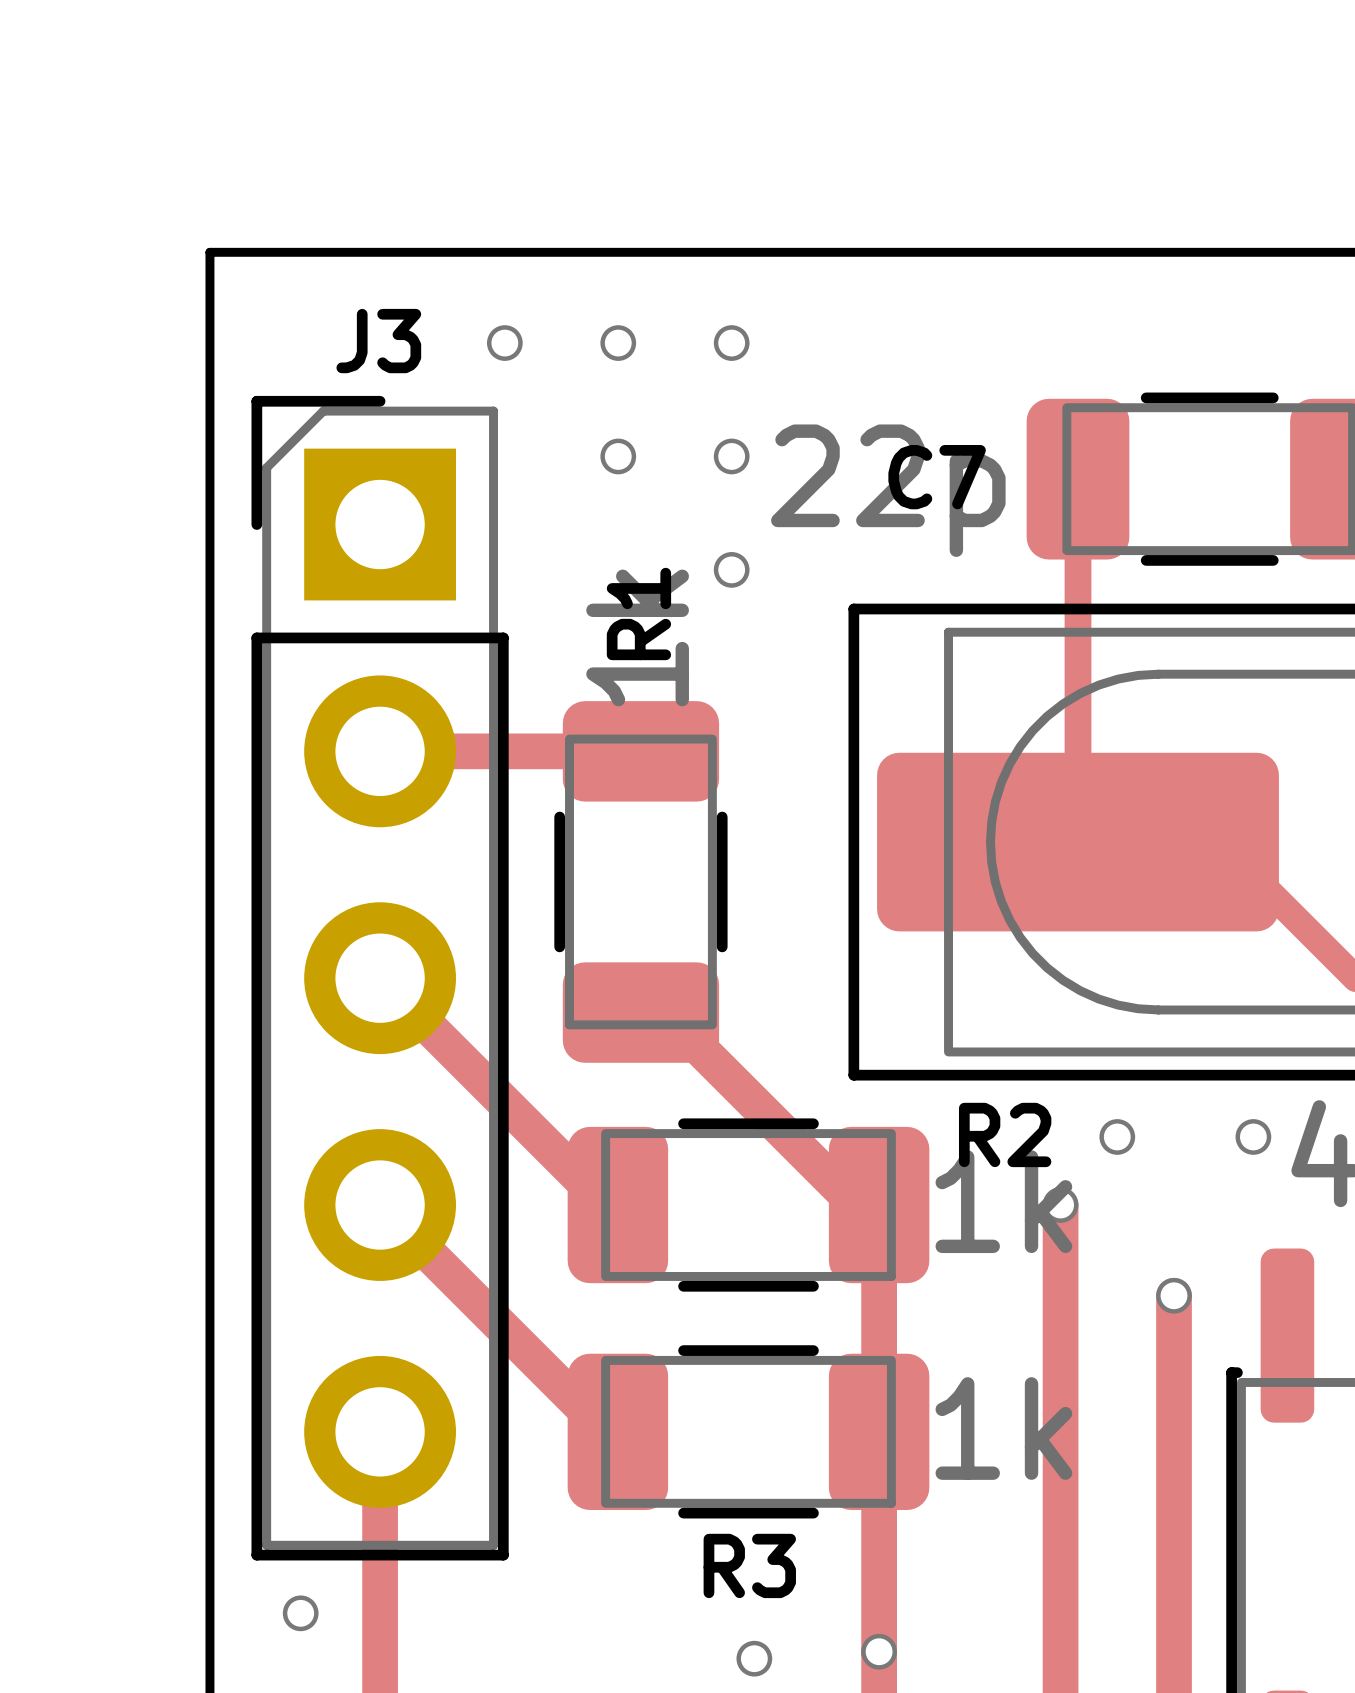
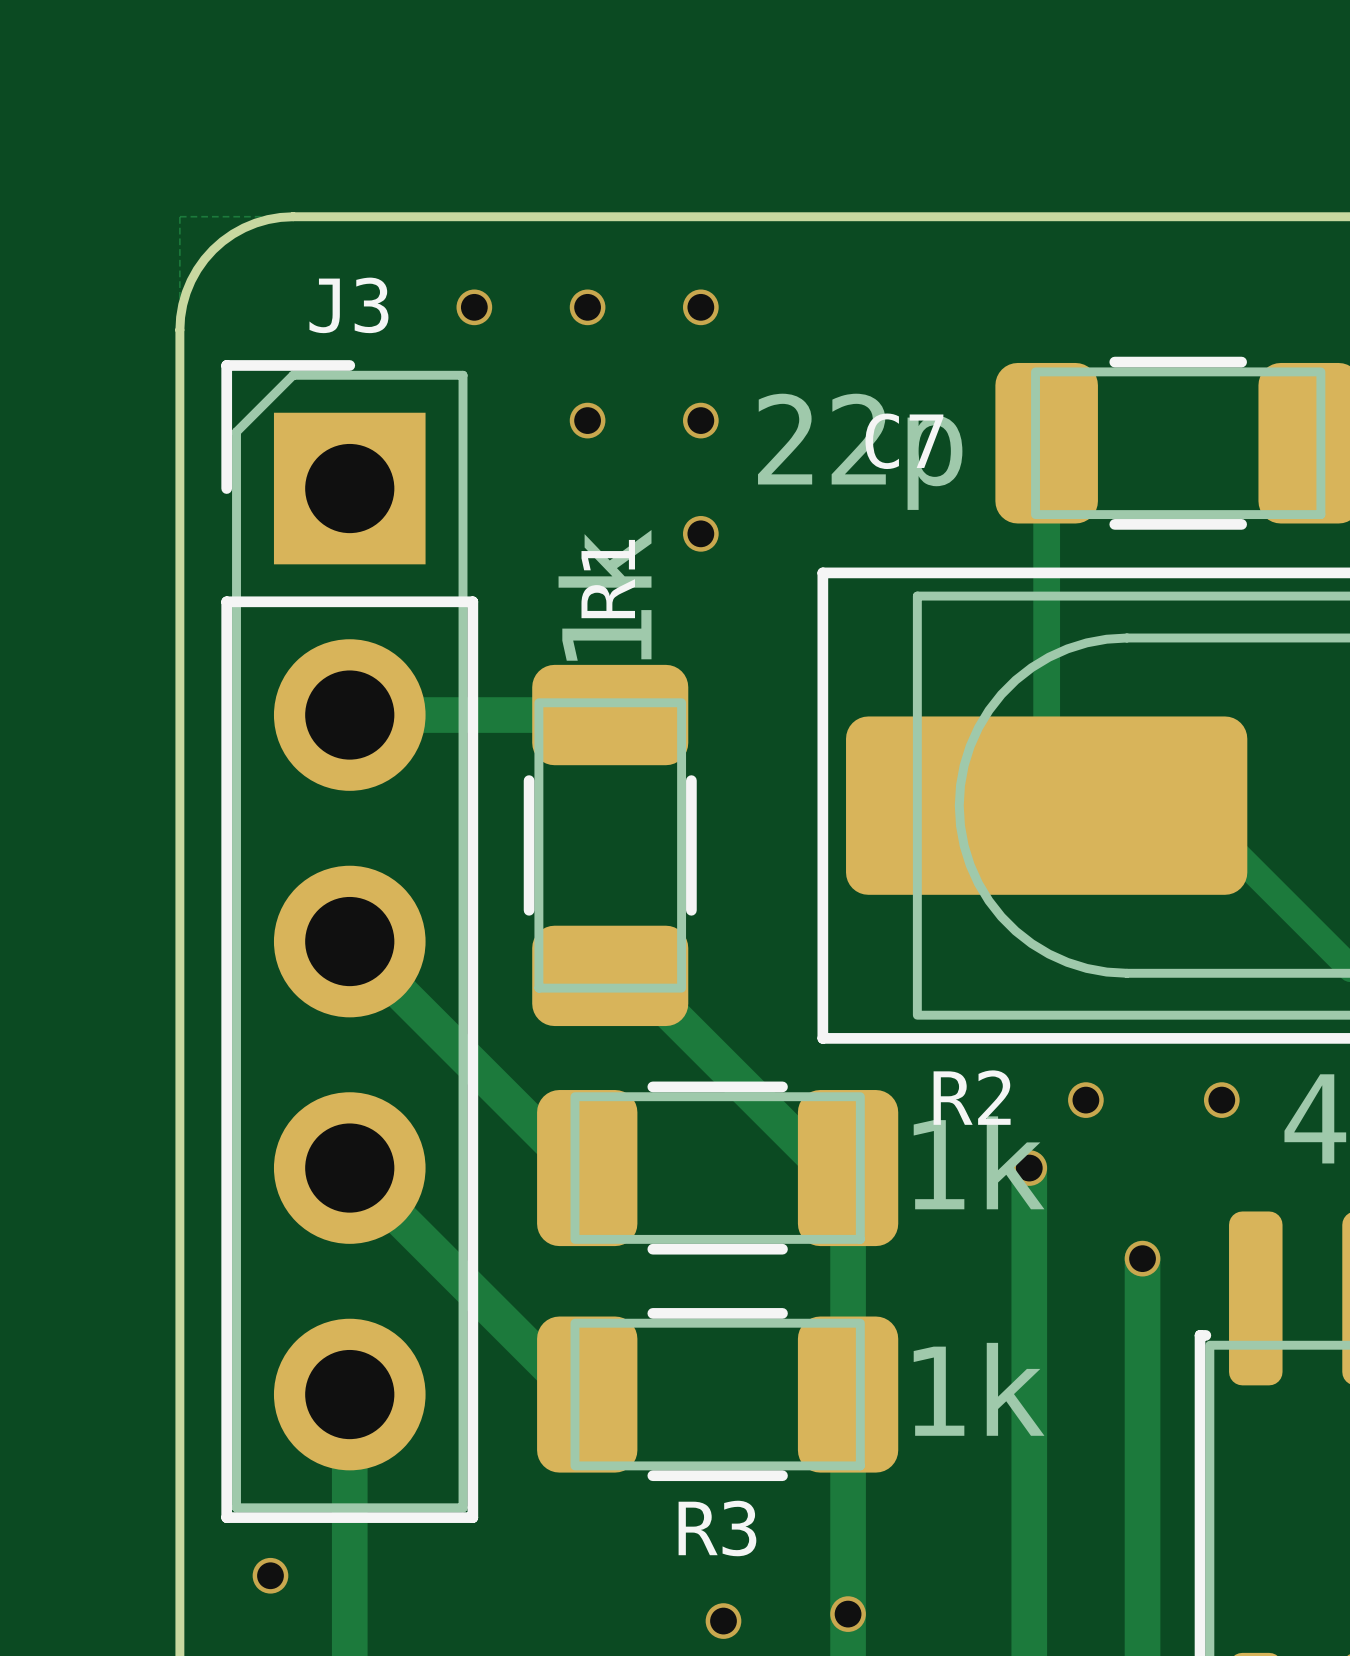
board edge: (323, 252) (209, 252) (209, 365) -> (293, 216) (255, 223) (232, 234) (213, 249) (191, 280) (182, 304) (179, 329)

